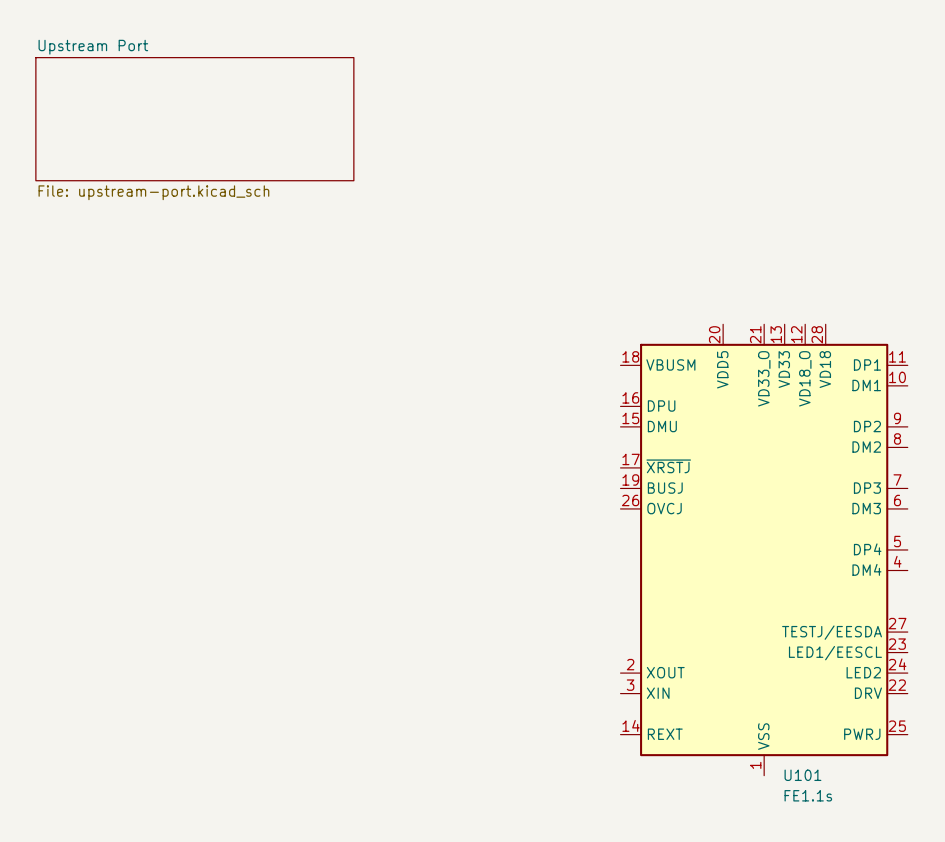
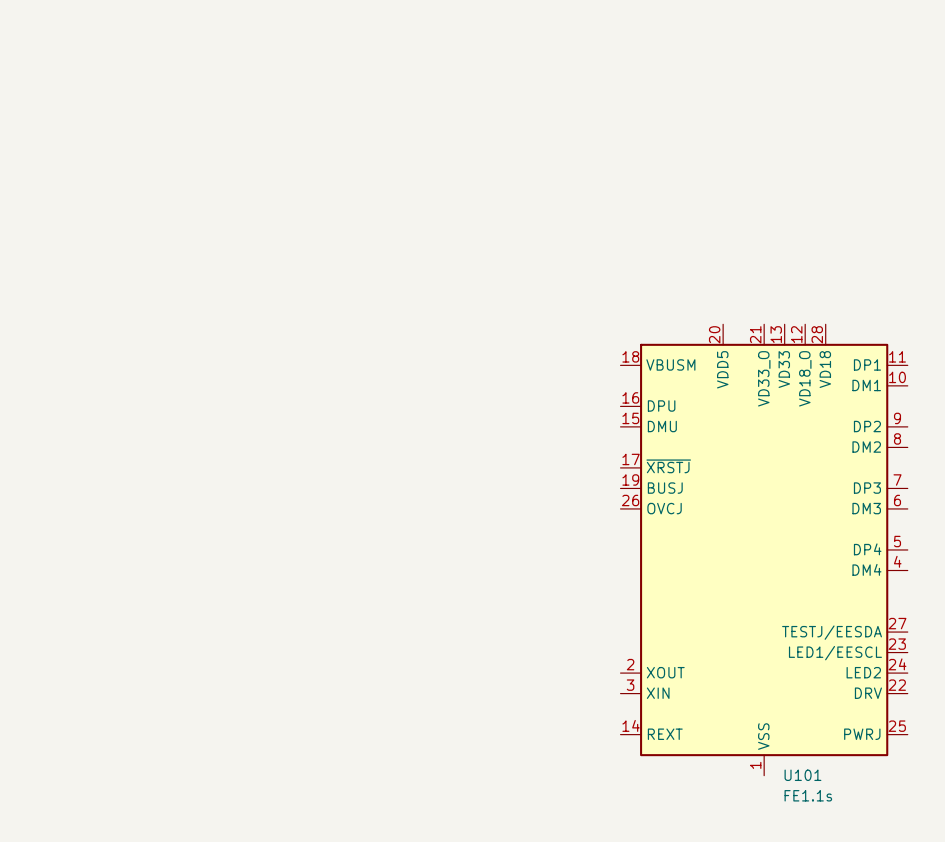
sheet Upstream Port: File: upstream-port.kicad_sch (194, 119) -> none

